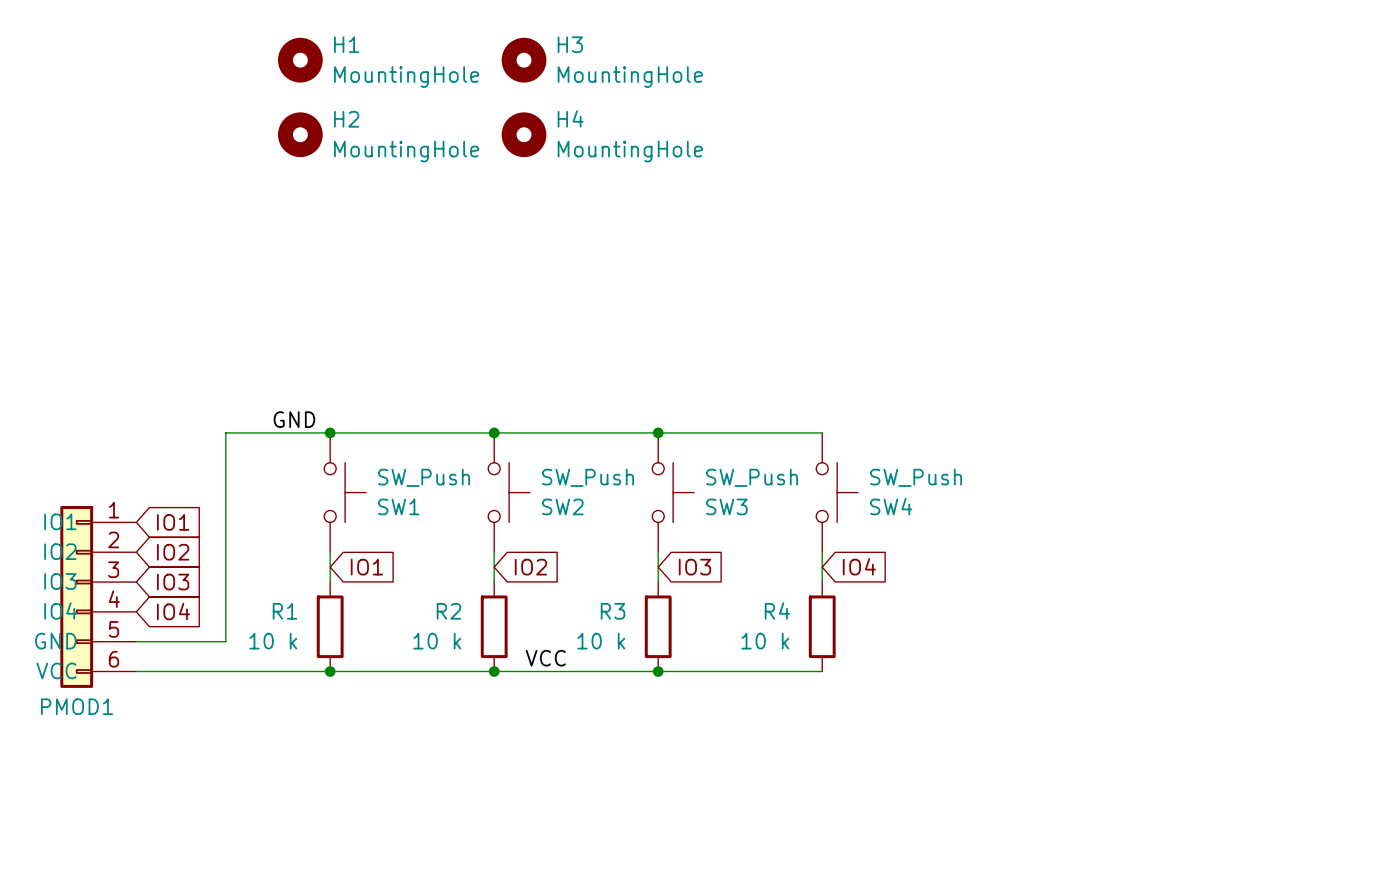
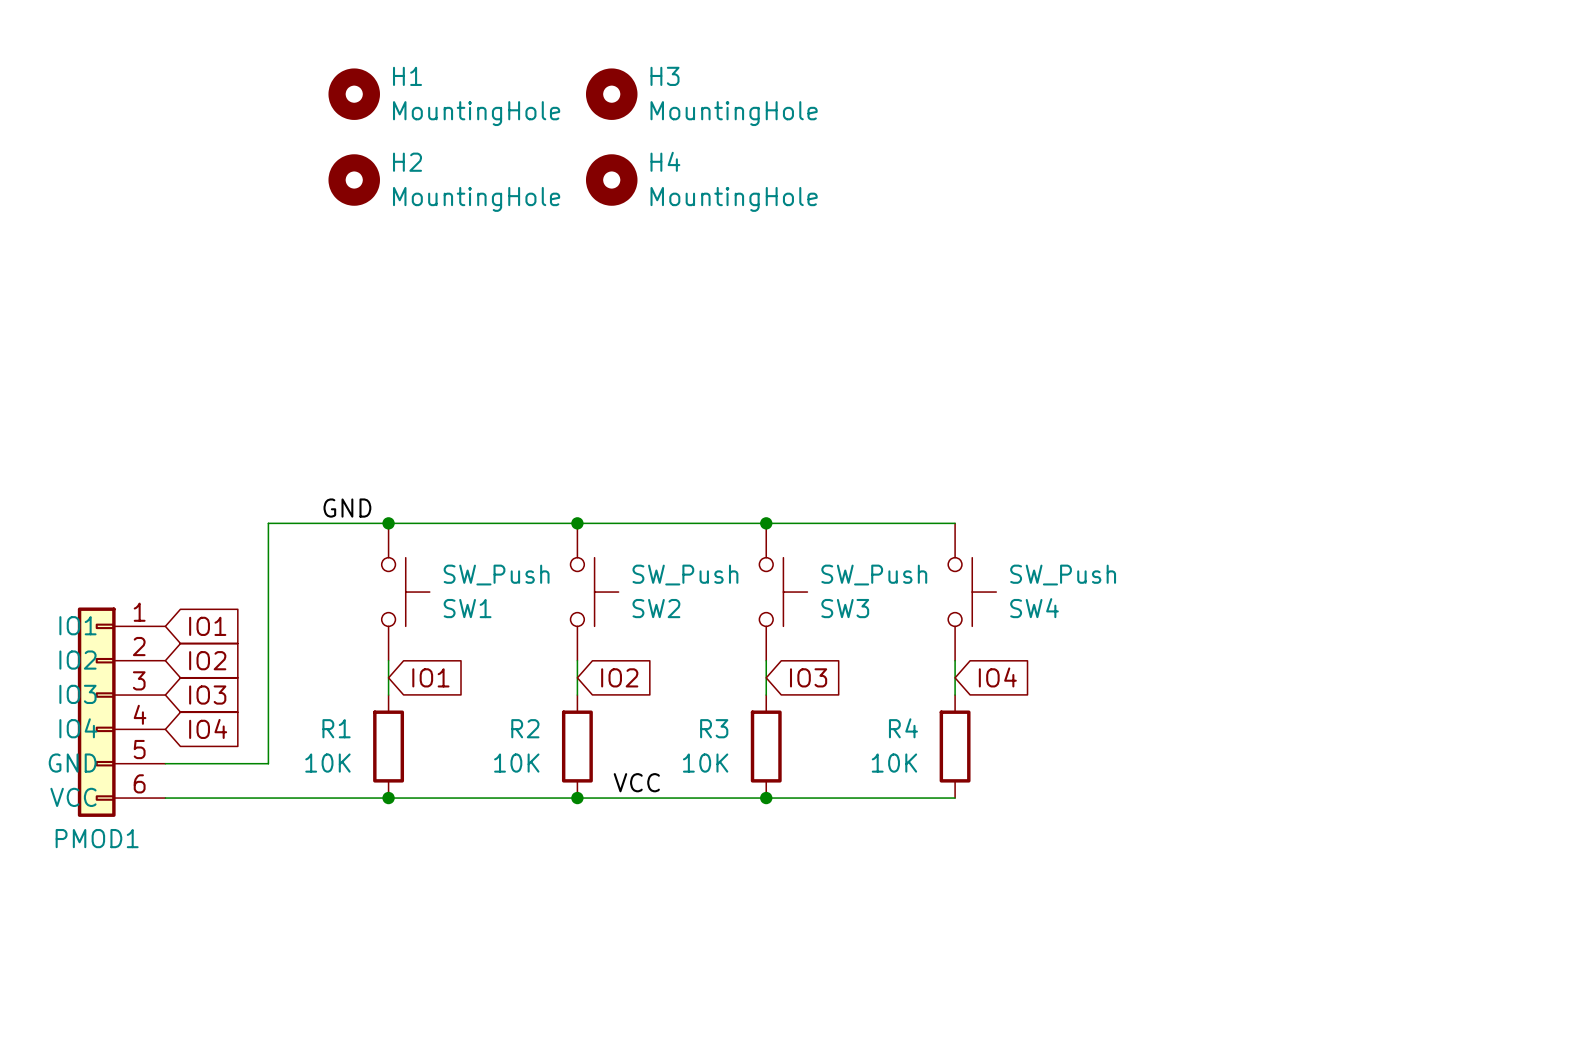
R1 value: 10 k (273, 641) -> 10K (327, 763)
R2 value: 10 k (437, 641) -> 10K (516, 763)
R3 value: 10 k (601, 641) -> 10K (705, 763)
R4 value: 10 k (765, 641) -> 10K (894, 763)

